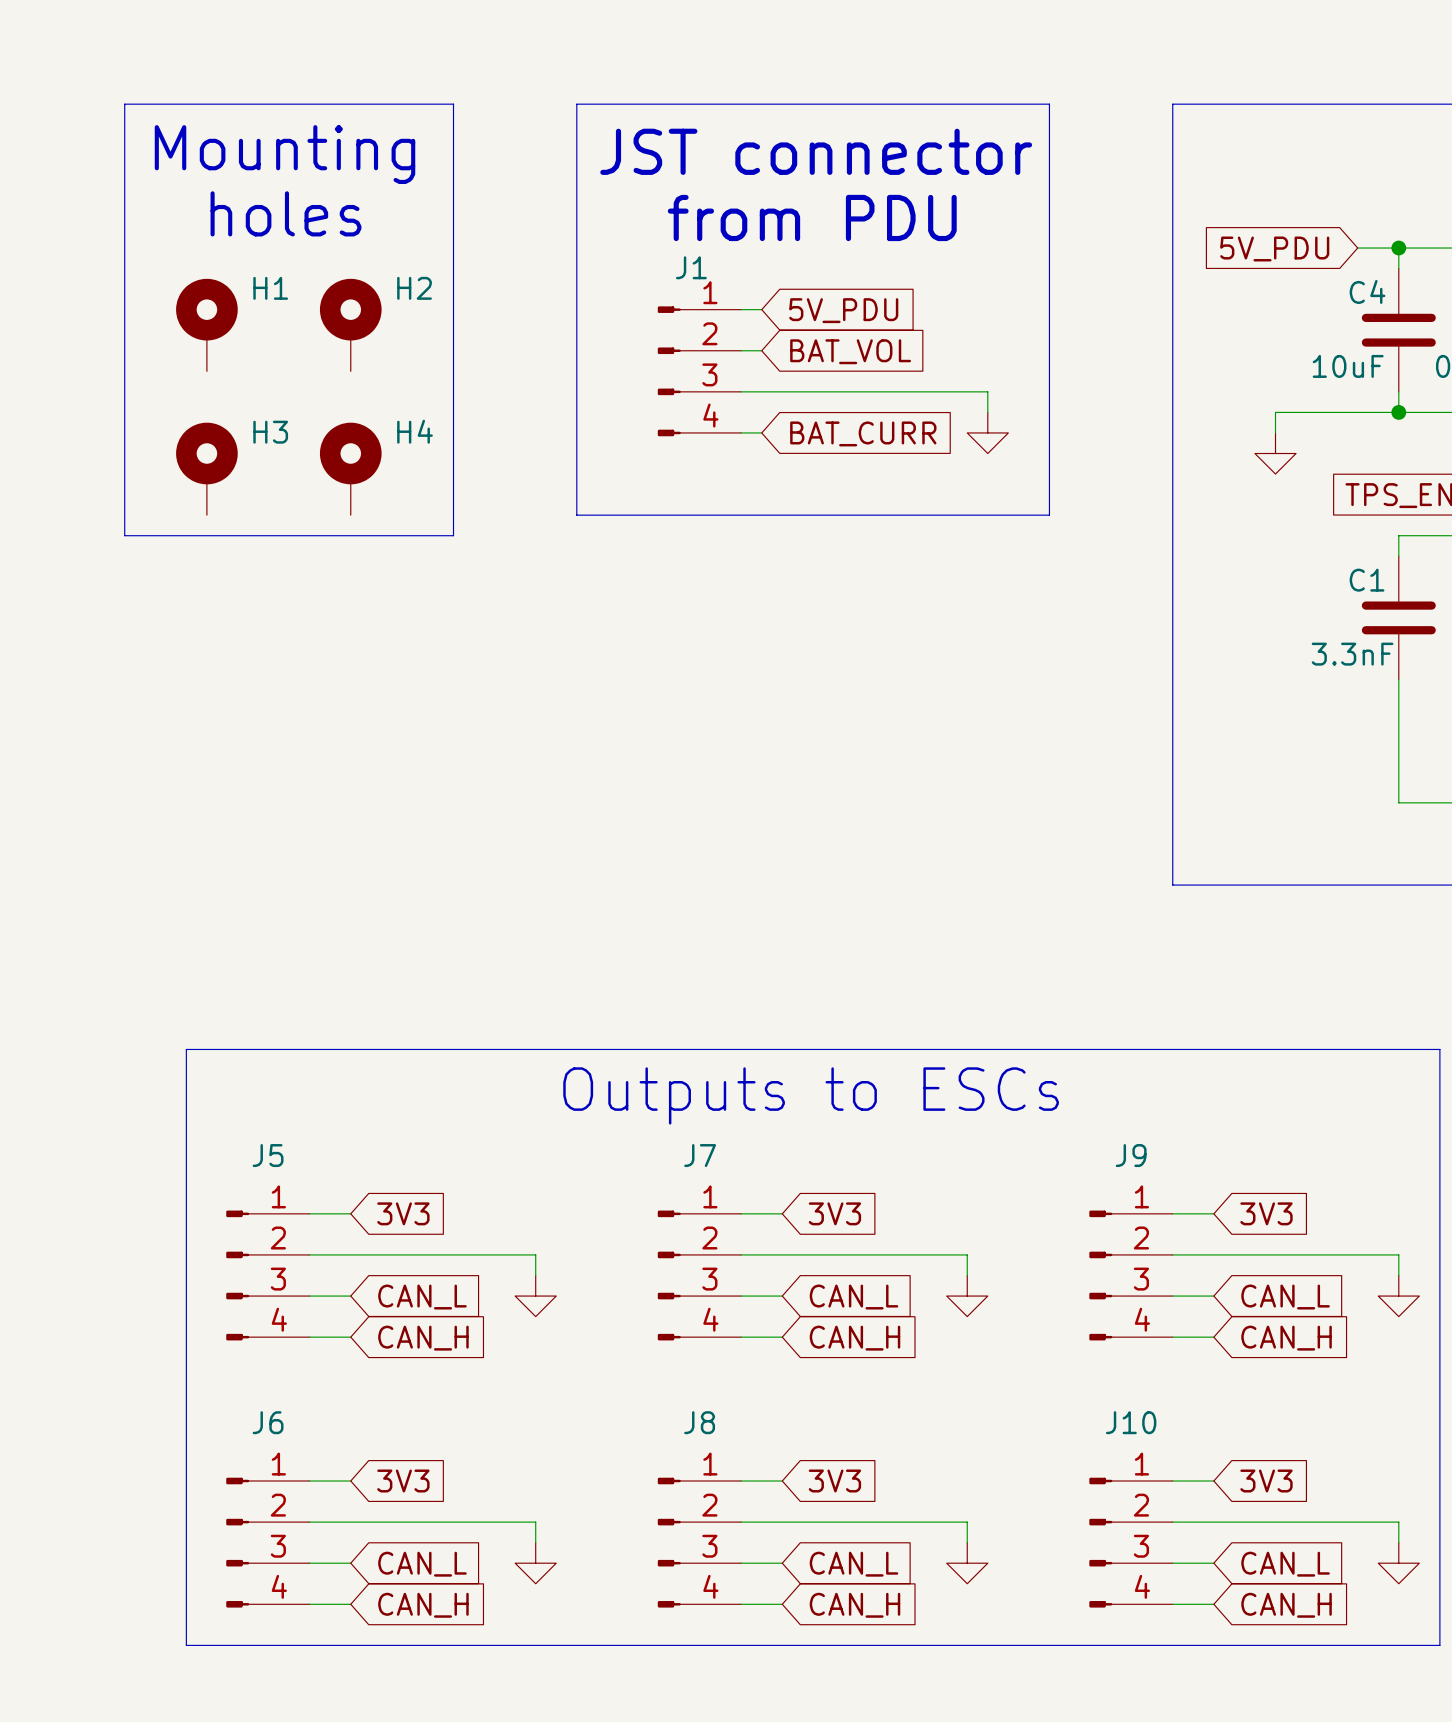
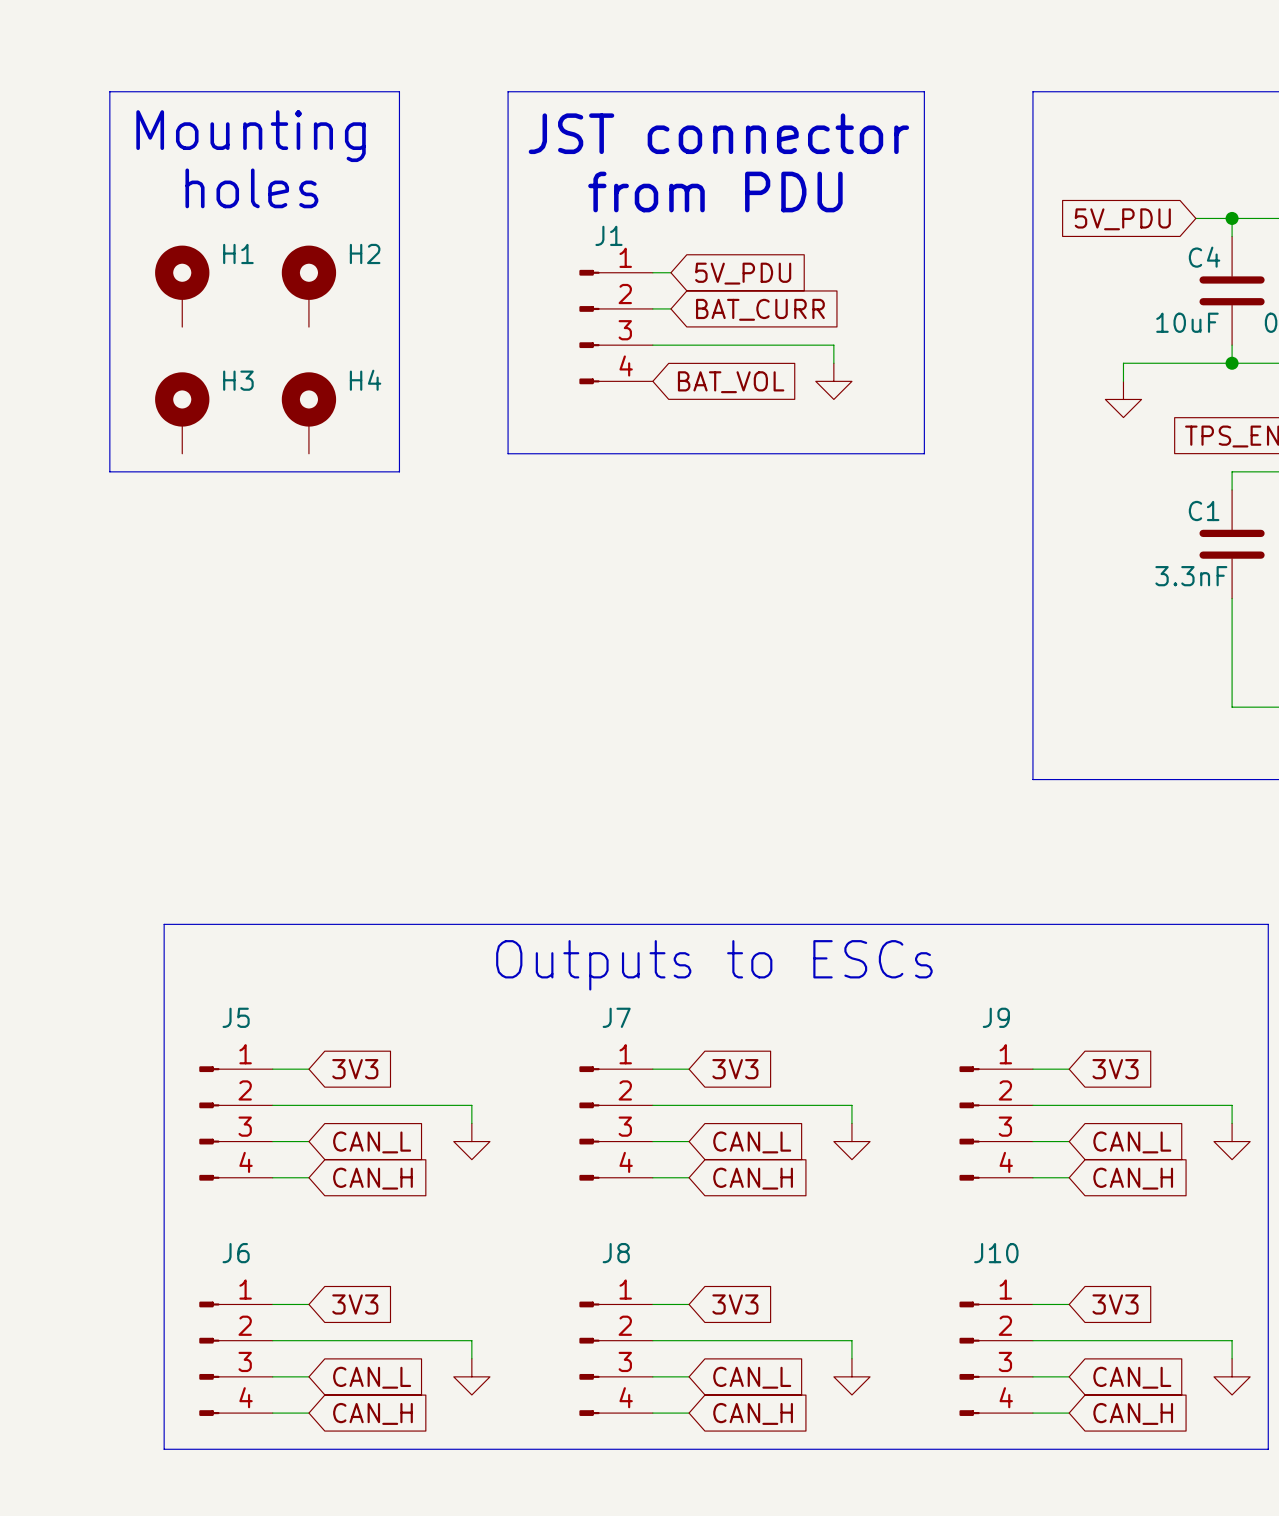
global label: BAT_VOL (850, 351) -> BAT_CURR (760, 309)
wire: (946, 391) (987, 391) (987, 412) -> (833, 345) (833, 363)
wire: (741, 432) (761, 432) -> none
power symbol position: (987, 432) -> (833, 381)
global label: none -> BAT_VOL (731, 382)
global label: BAT_CURR (863, 433) -> none

